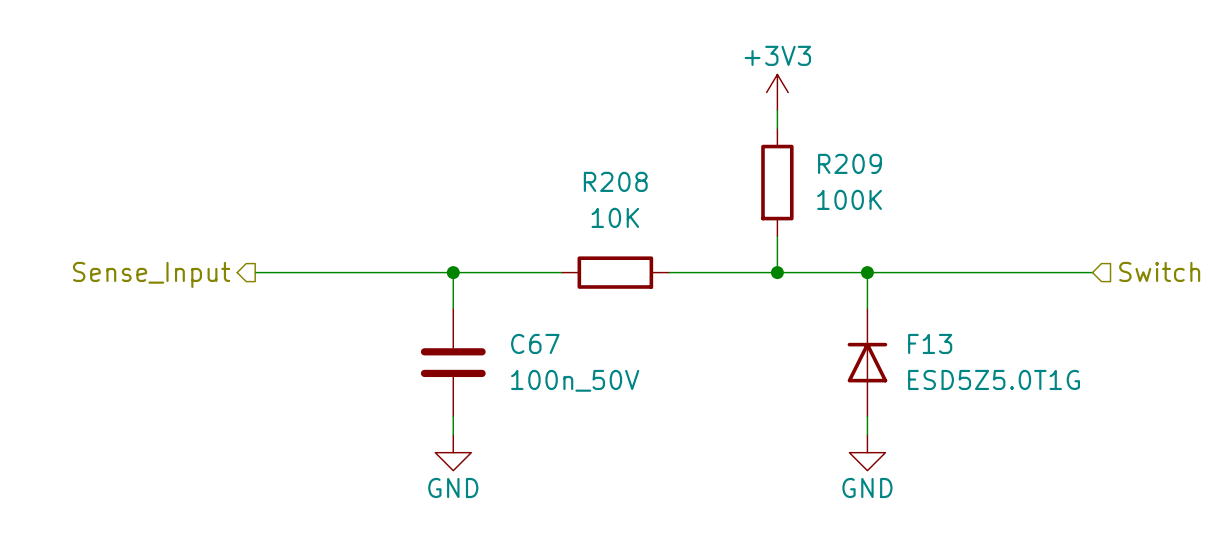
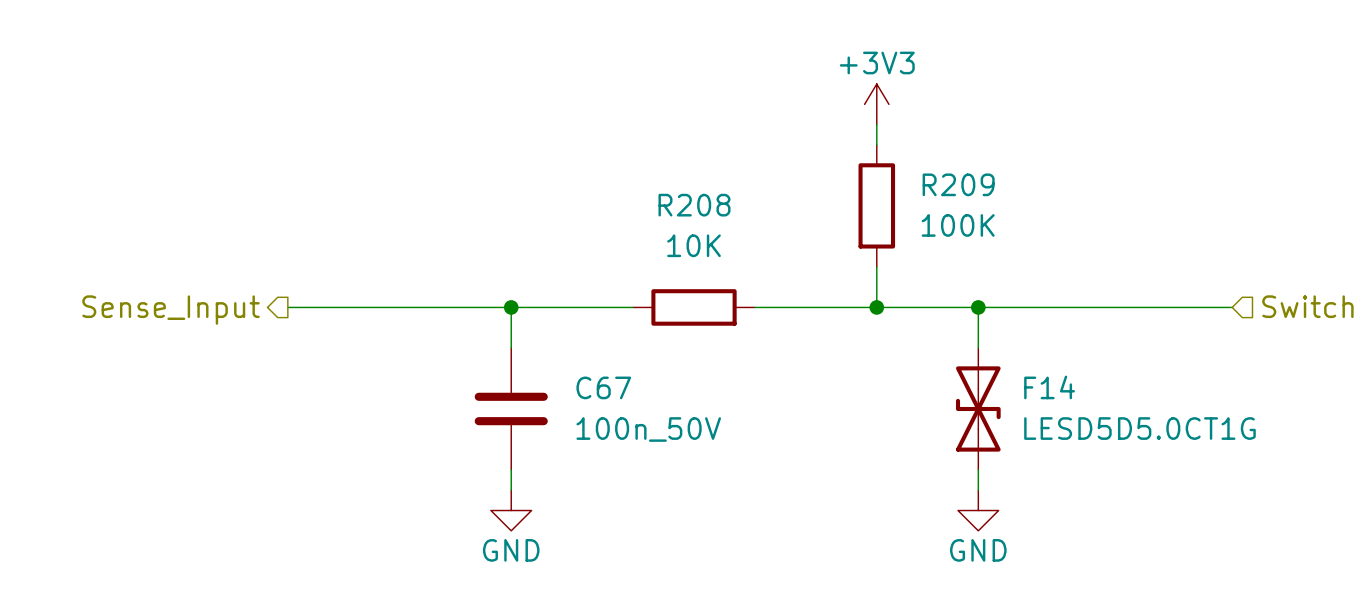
F13: ESD5Z5.0T1G (867, 362) -> none
F14: none -> LESD5D5.0CT1G (978, 408)

